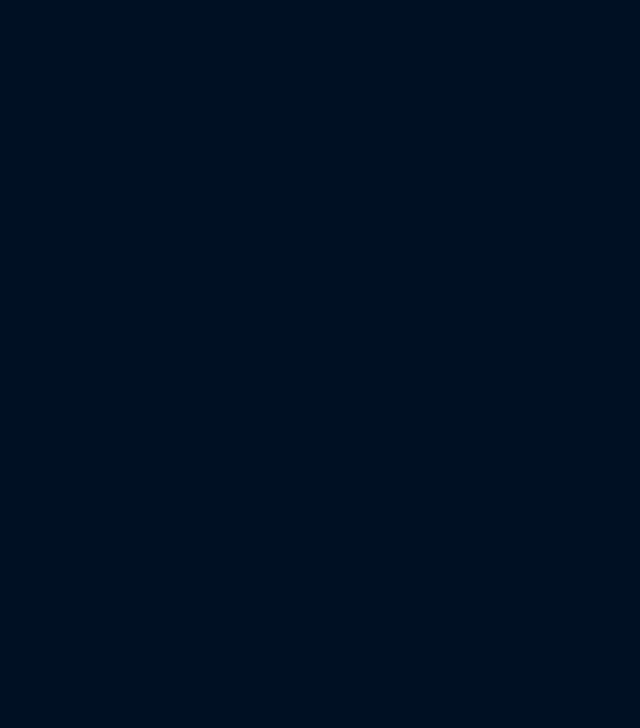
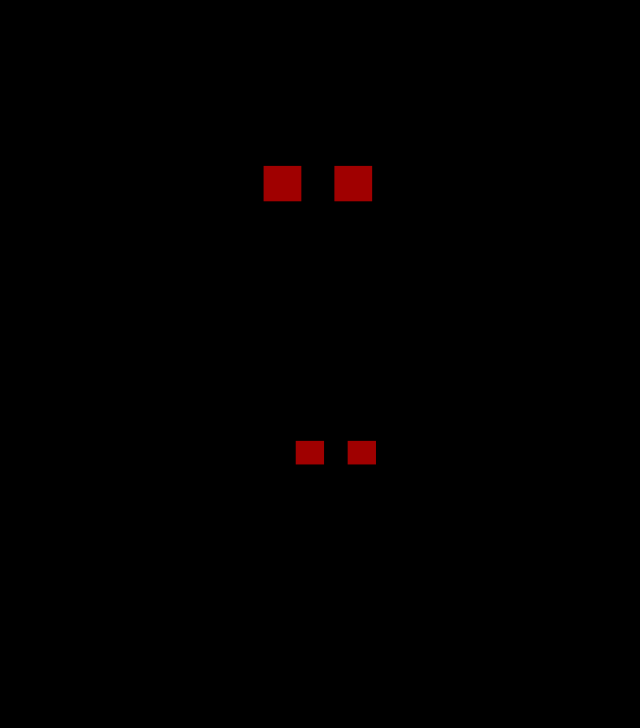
part: none -> (317, 183)
part: none -> (335, 452)

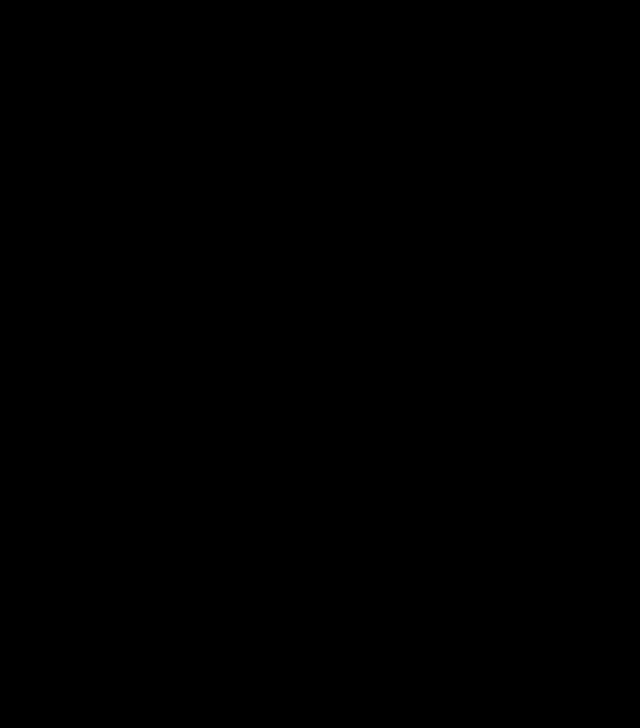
part: (317, 183) -> none
part: (335, 452) -> none

